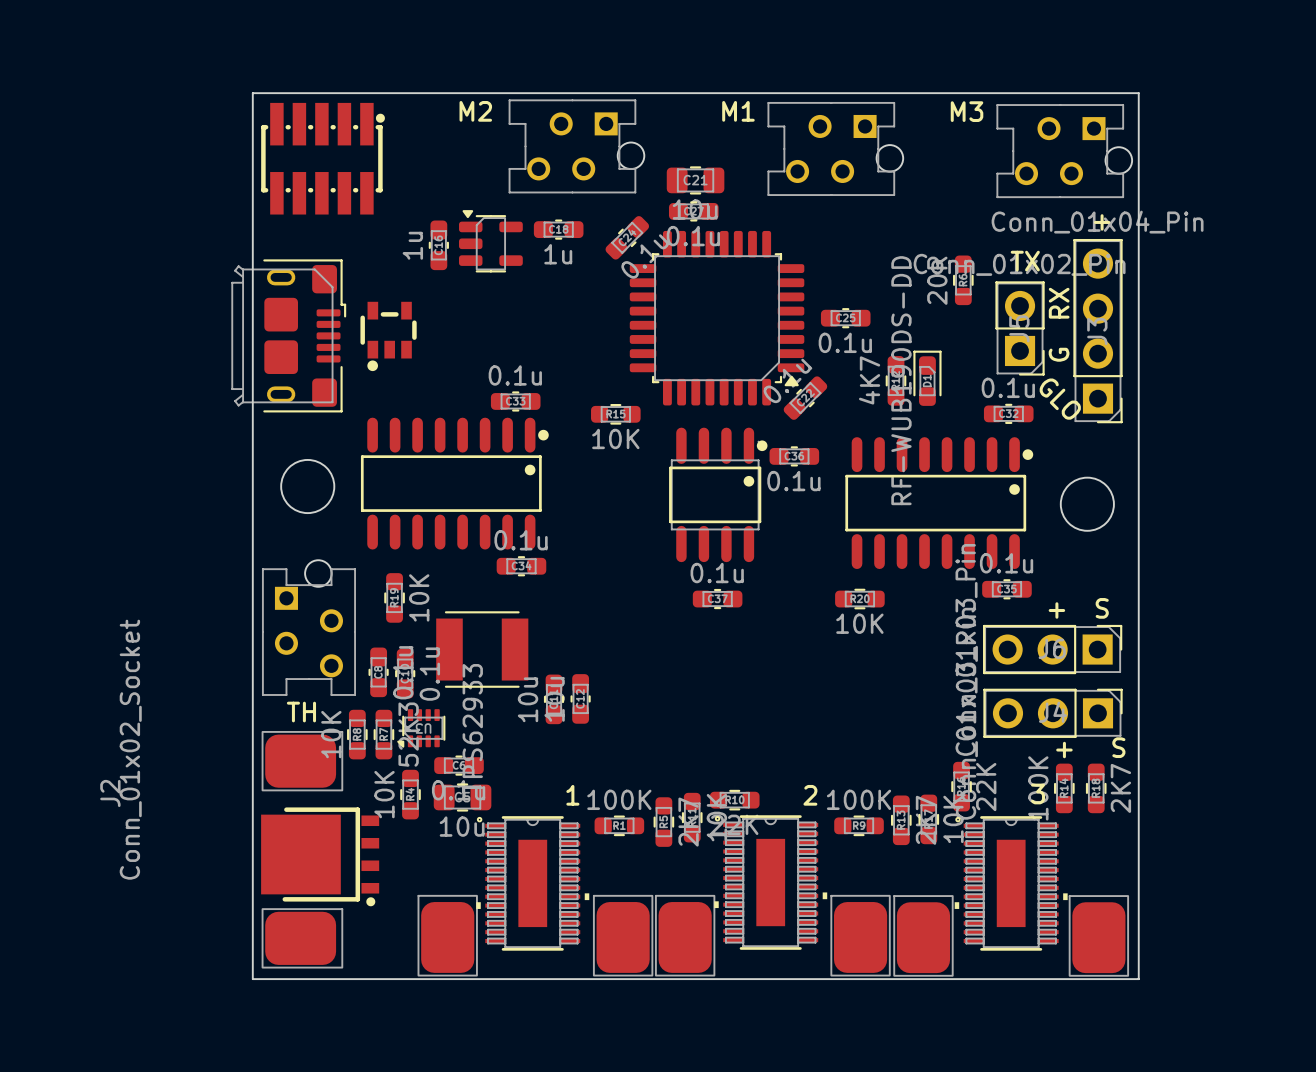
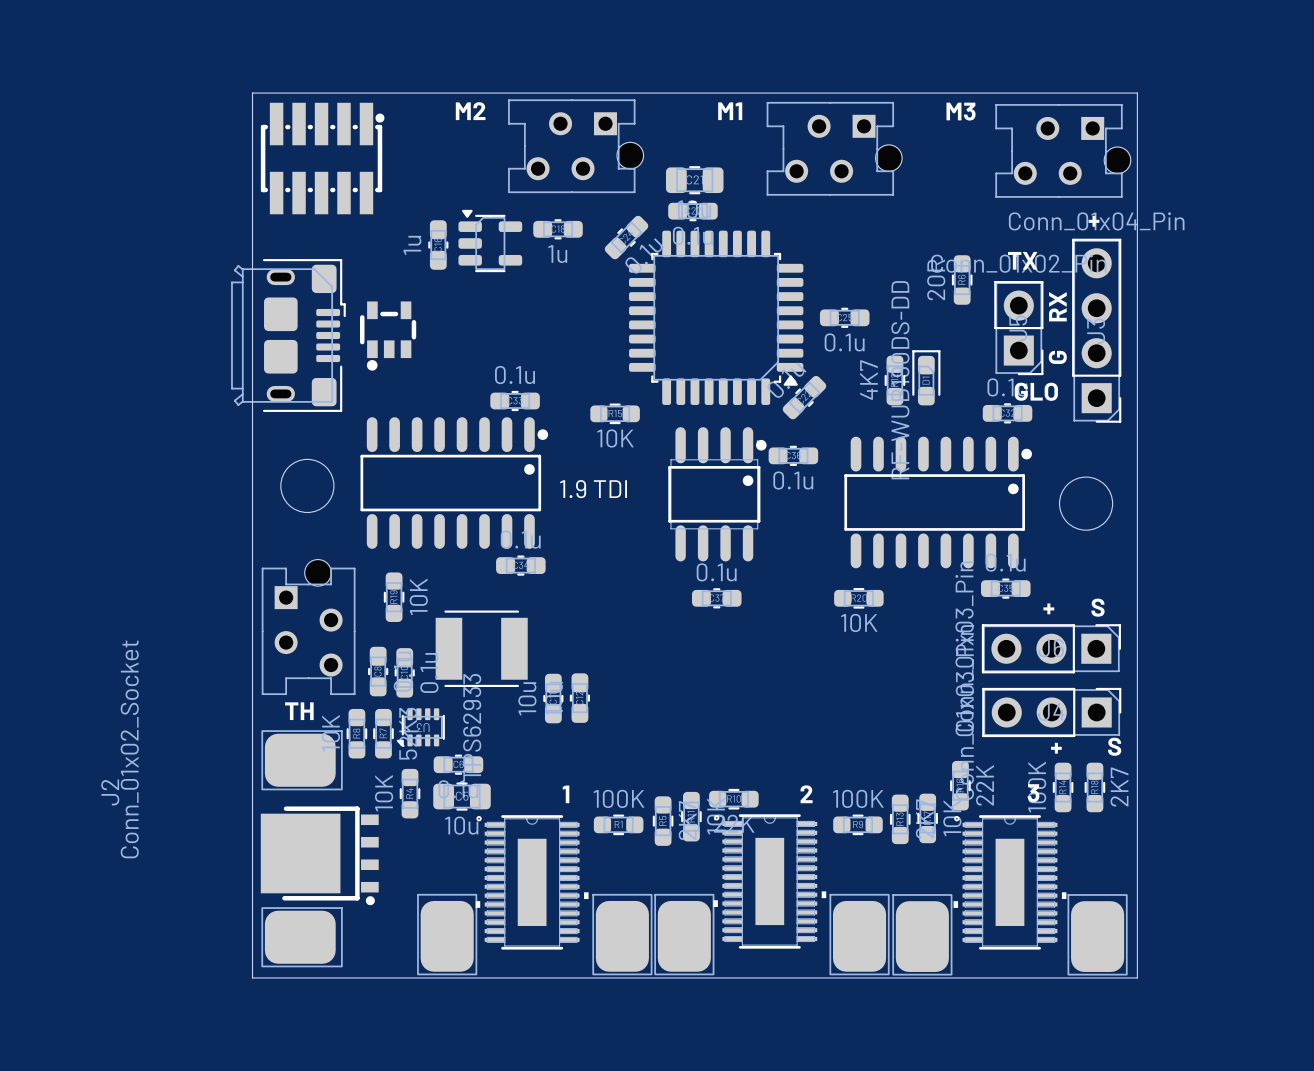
text rotation: 0° (1060, 399) -> 45° counterclockwise (1036, 391)
text: none -> 1.9 TDI (593, 489)

